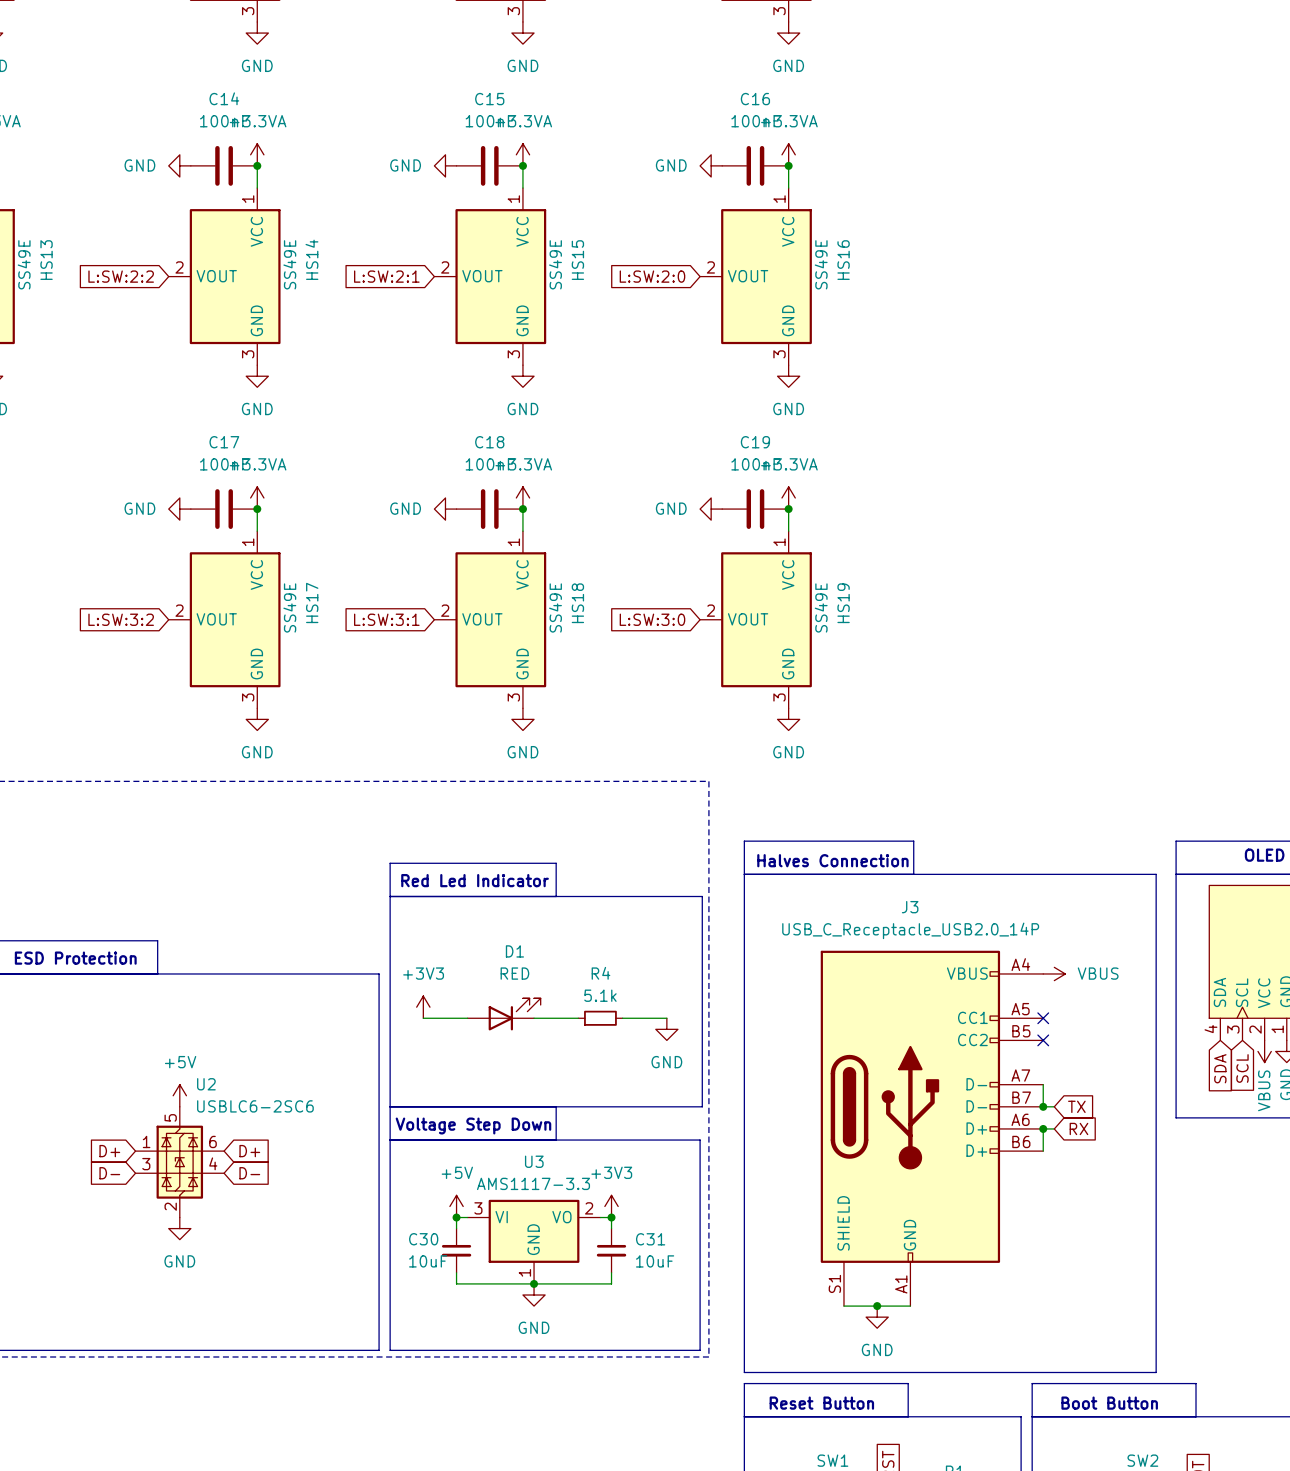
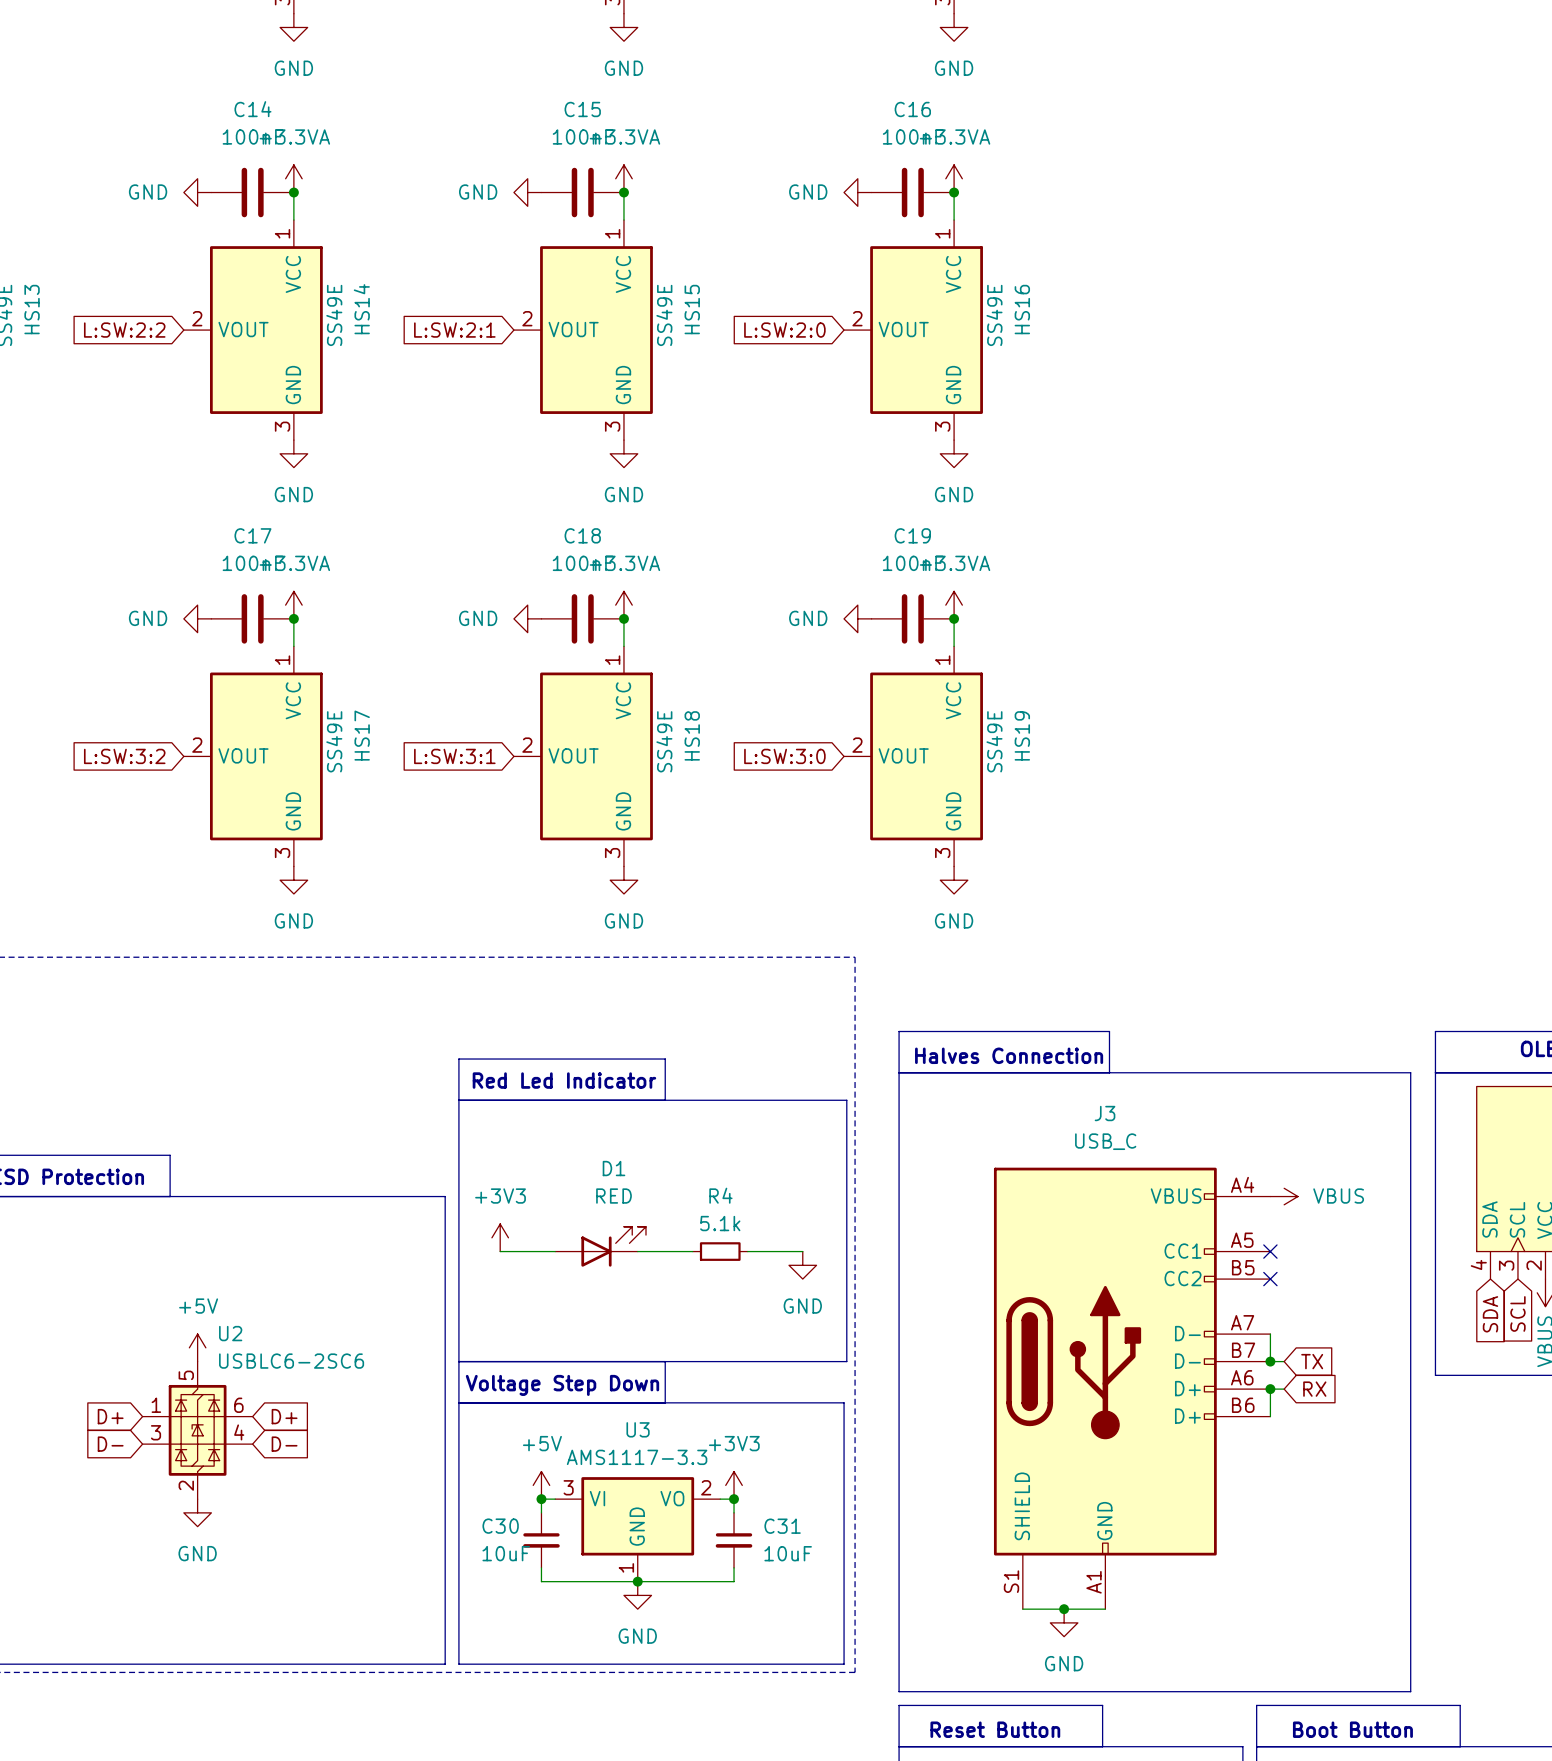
J3 value: USB_C_Receptacle_USB2.0_14P (910, 930) -> USB_C (1105, 1141)

